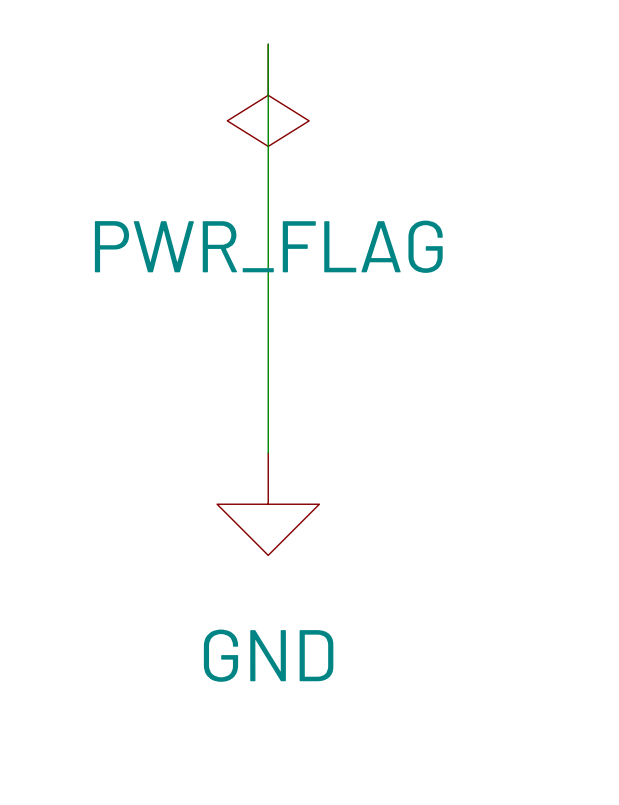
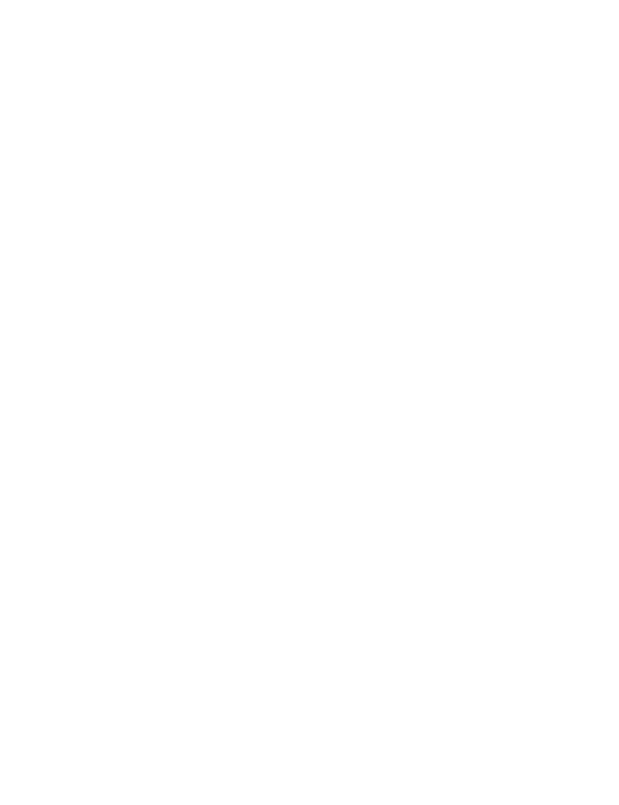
wire: (268, 44) (268, 453) -> none
power symbol: PWR_FLAG (268, 95) -> none
power symbol: GND (268, 504) -> none

